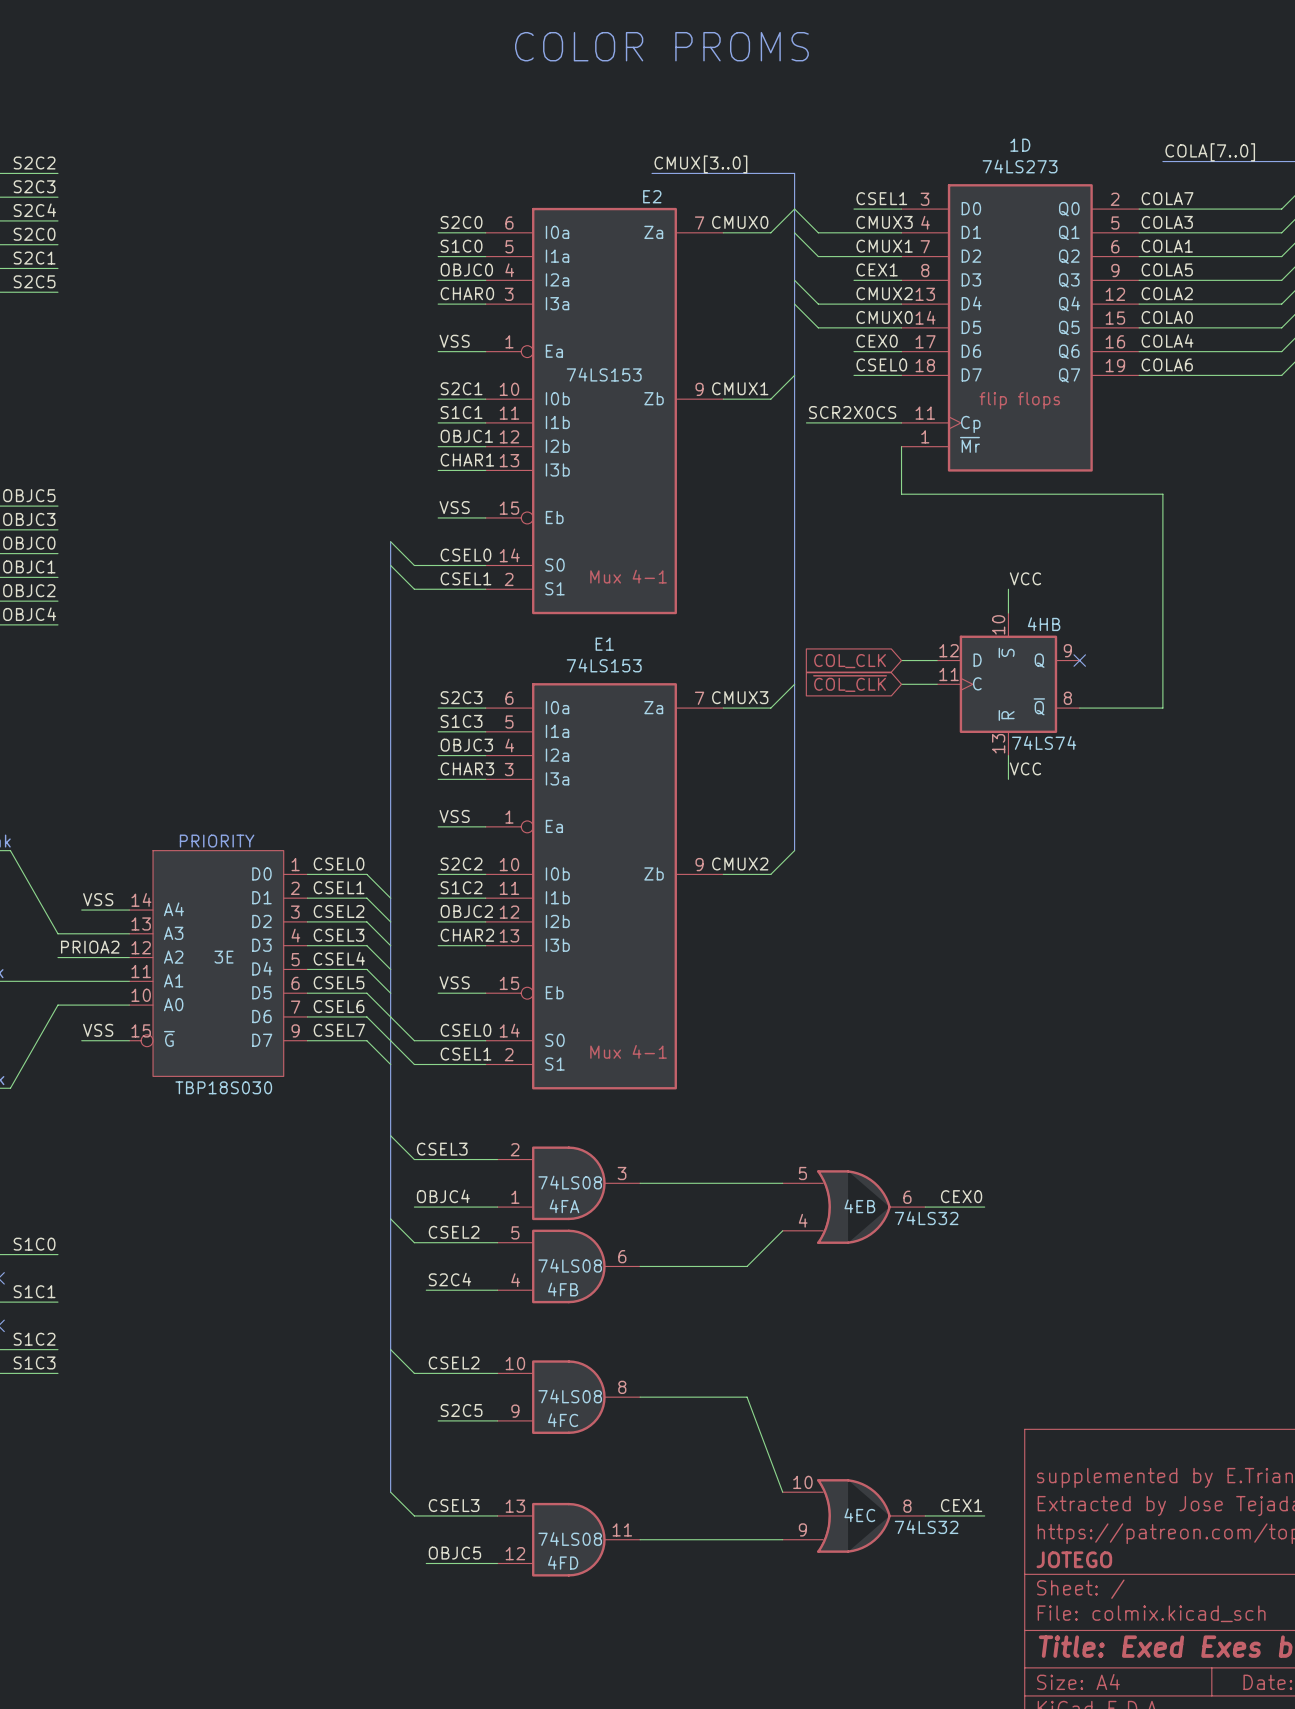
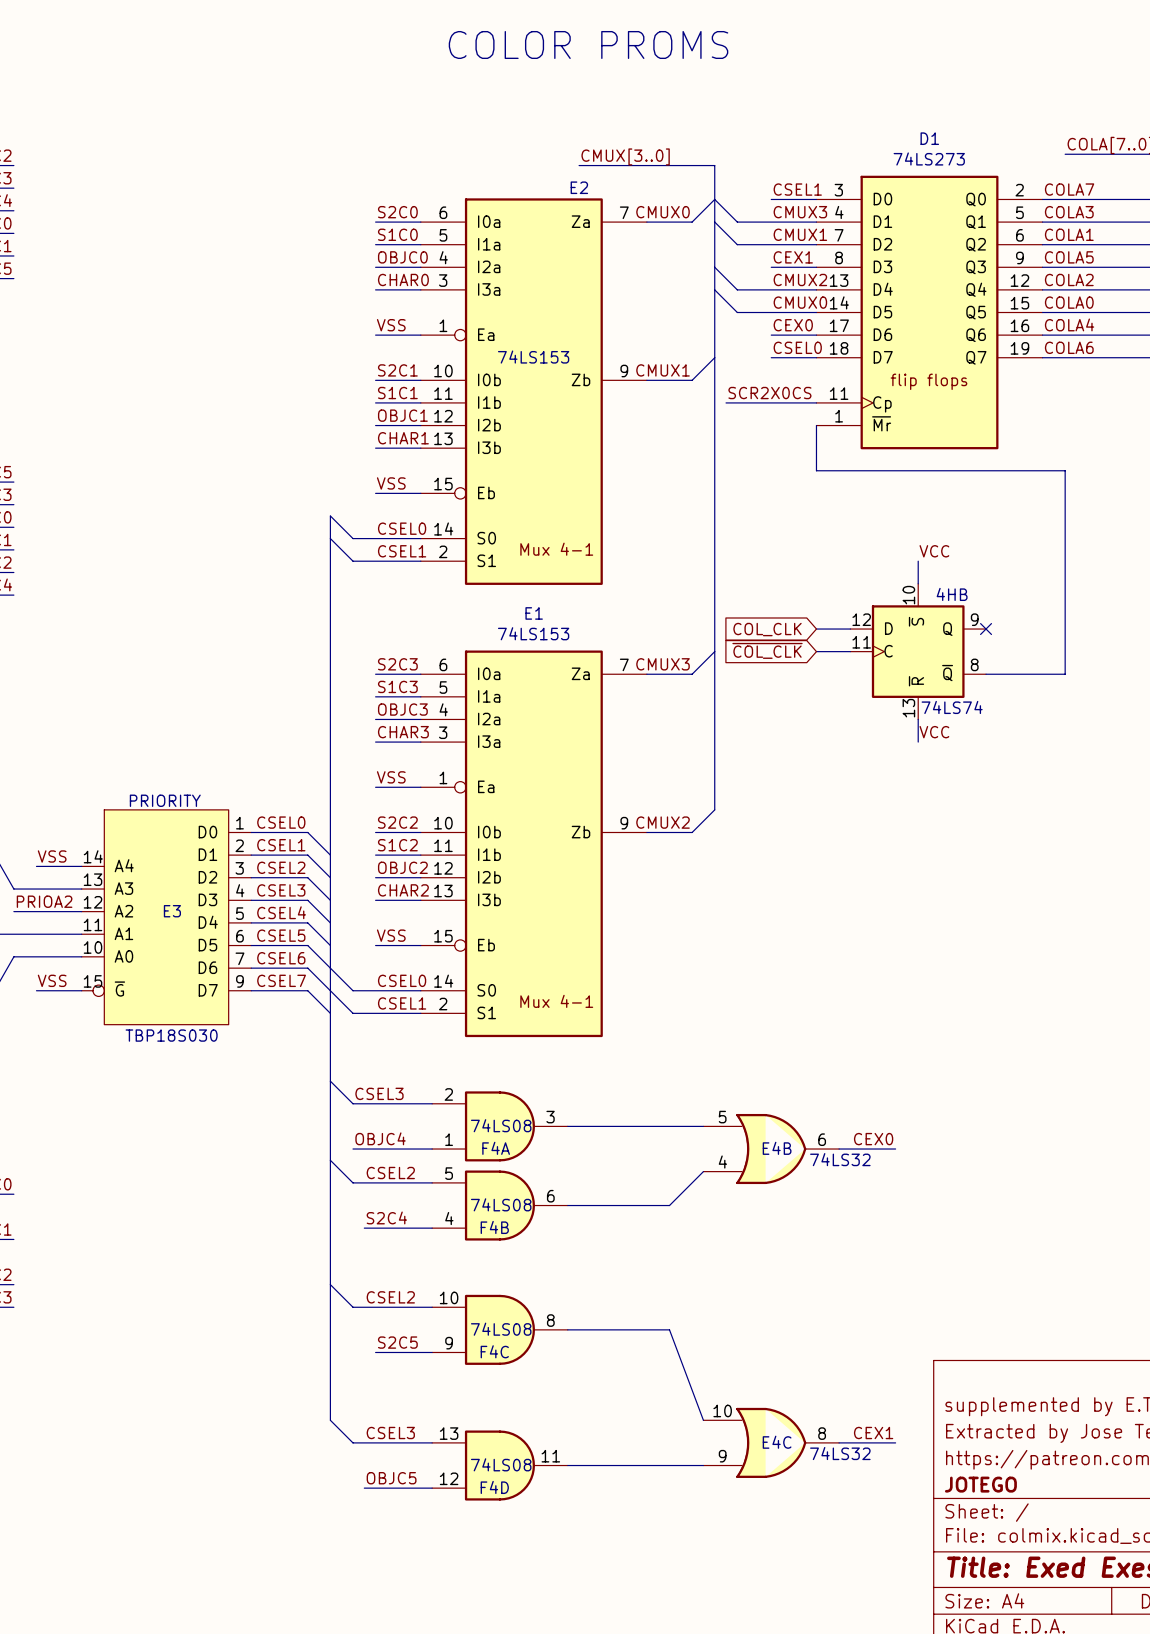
1D name: 1D (1020, 145) -> D1 (929, 138)
3E name: 3E (224, 957) -> E3 (172, 911)
4FA name: 4FA (564, 1206) -> F4A (496, 1148)
4EB name: 4EB (859, 1206) -> E4B (777, 1148)
4FB name: 4FB (563, 1289) -> F4B (494, 1227)
4FC name: 4FC (563, 1420) -> F4C (494, 1351)
4EC name: 4EC (859, 1515) -> E4C (777, 1442)
4FD name: 4FD (563, 1562) -> F4D (494, 1487)

